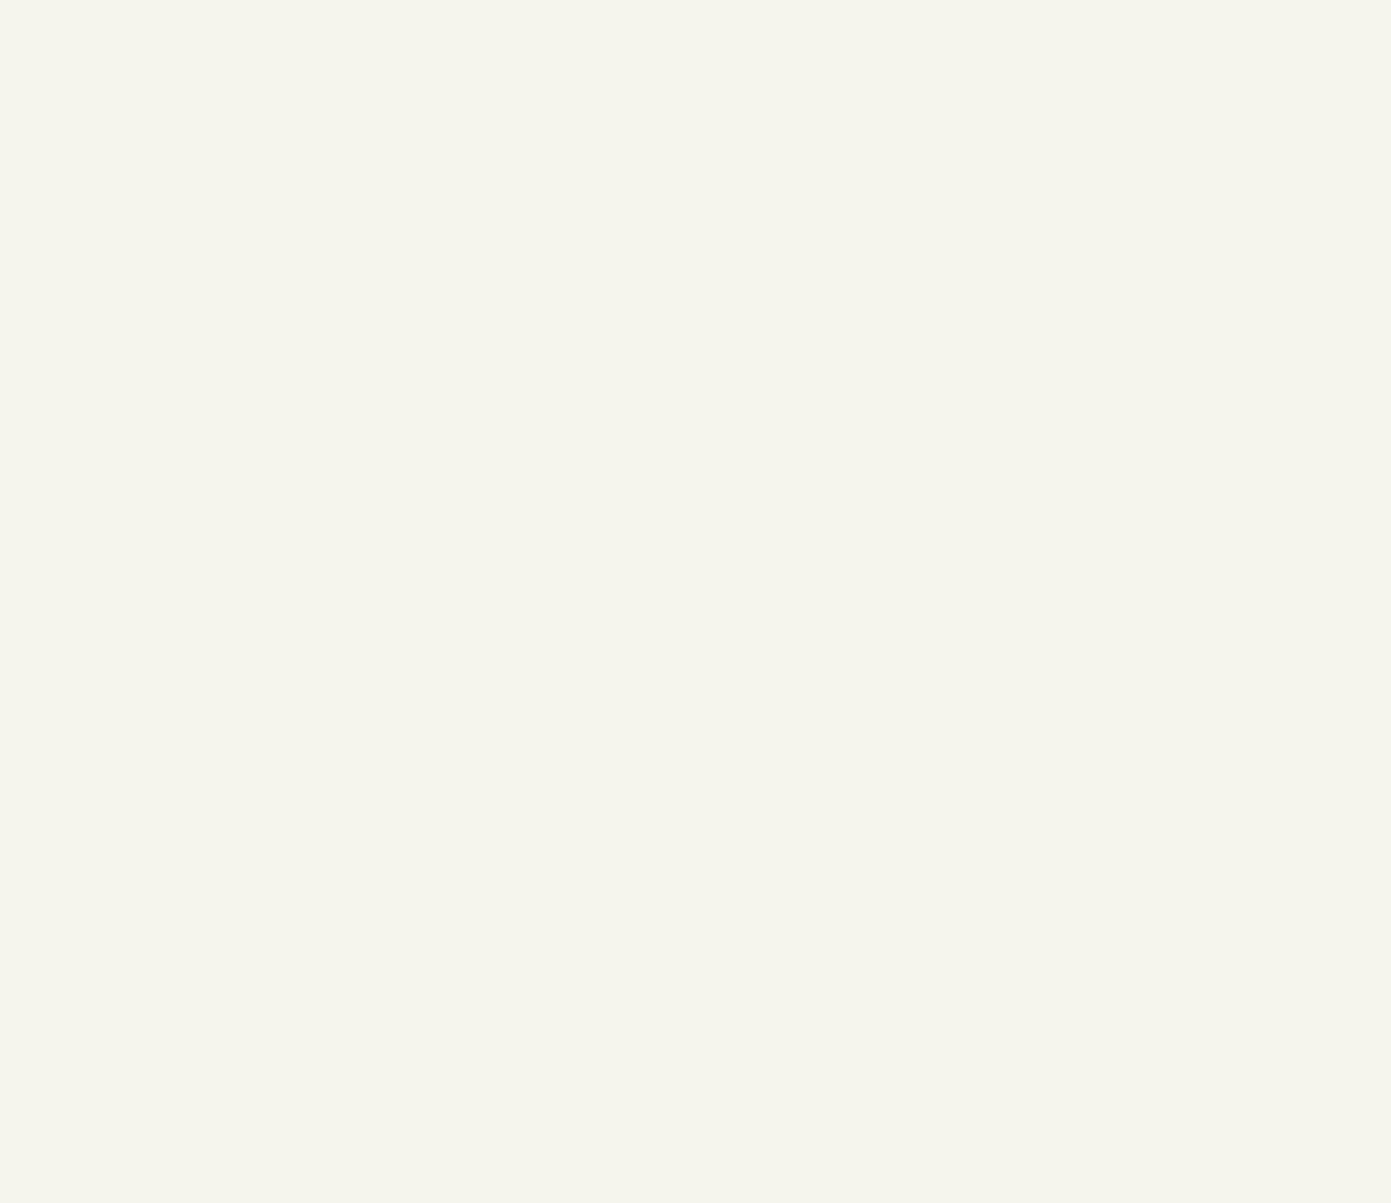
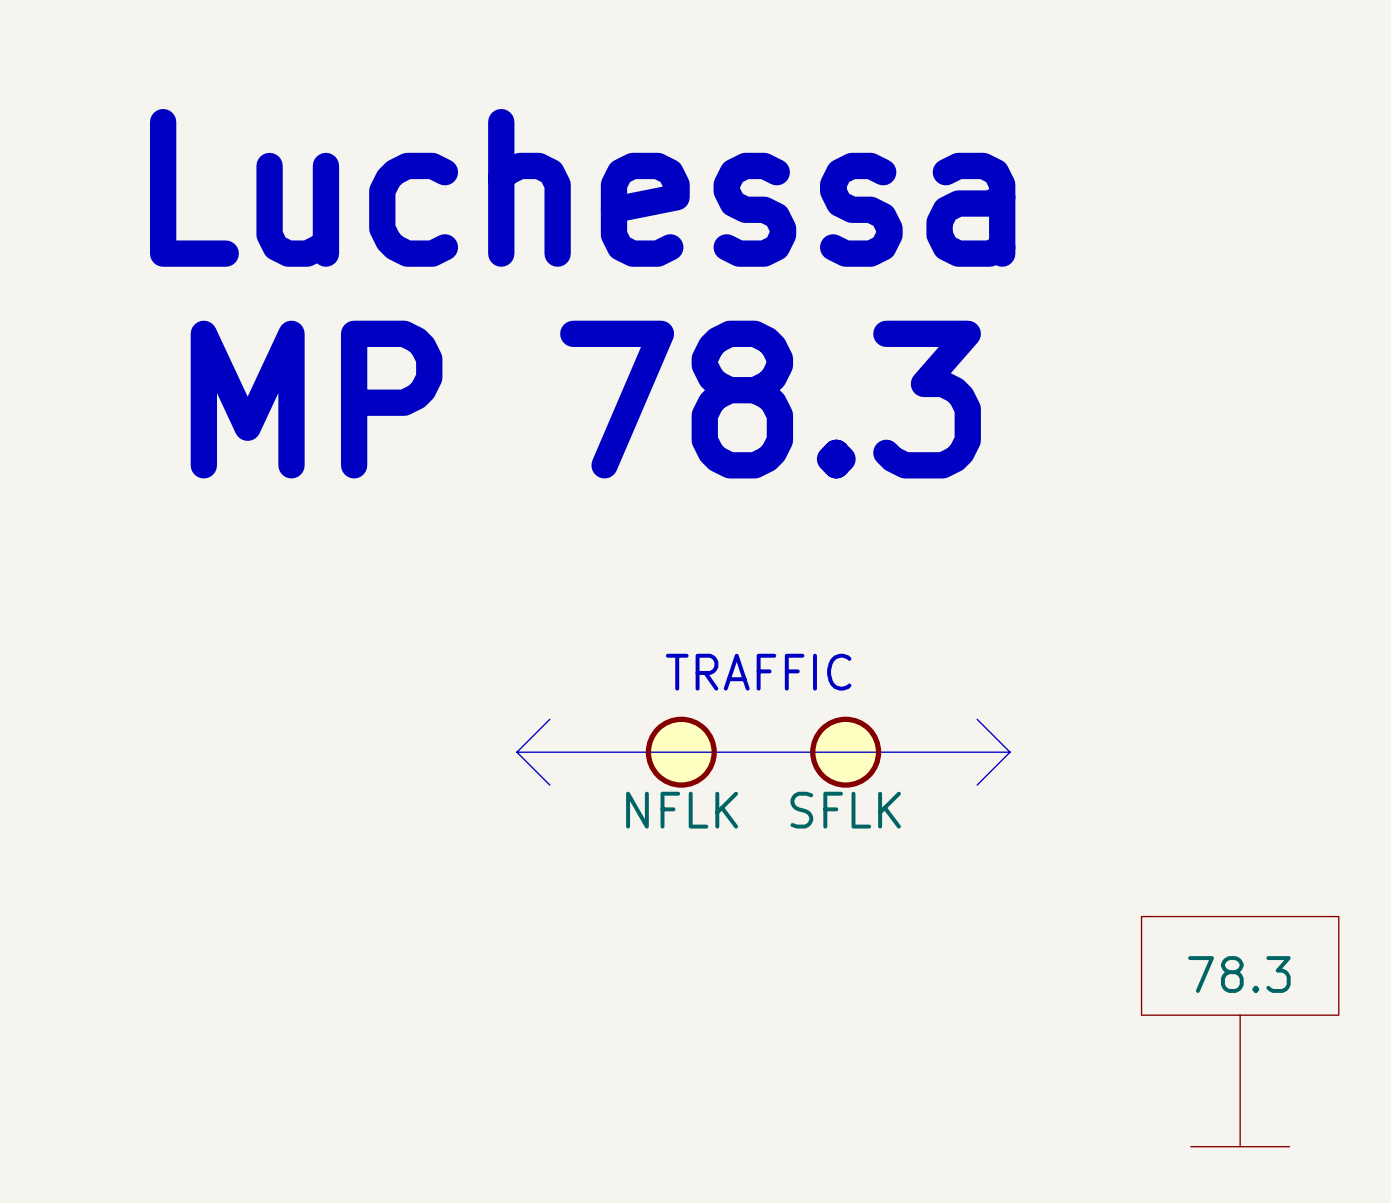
text: none -> Luchessa (582, 187)
text: none -> MP 78.3 (585, 399)
text: none -> TRAFFIC (758, 672)
line: none -> (549, 719) (516, 752)
line: none -> (977, 719) (1010, 752)
line: none -> (516, 752) (1010, 752)
line: none -> (516, 752) (549, 785)
part: none -> NFLK (681, 752)
part: none -> SFLK (845, 752)
line: none -> (1010, 752) (977, 785)
part: none -> 78.3 (1240, 1031)

